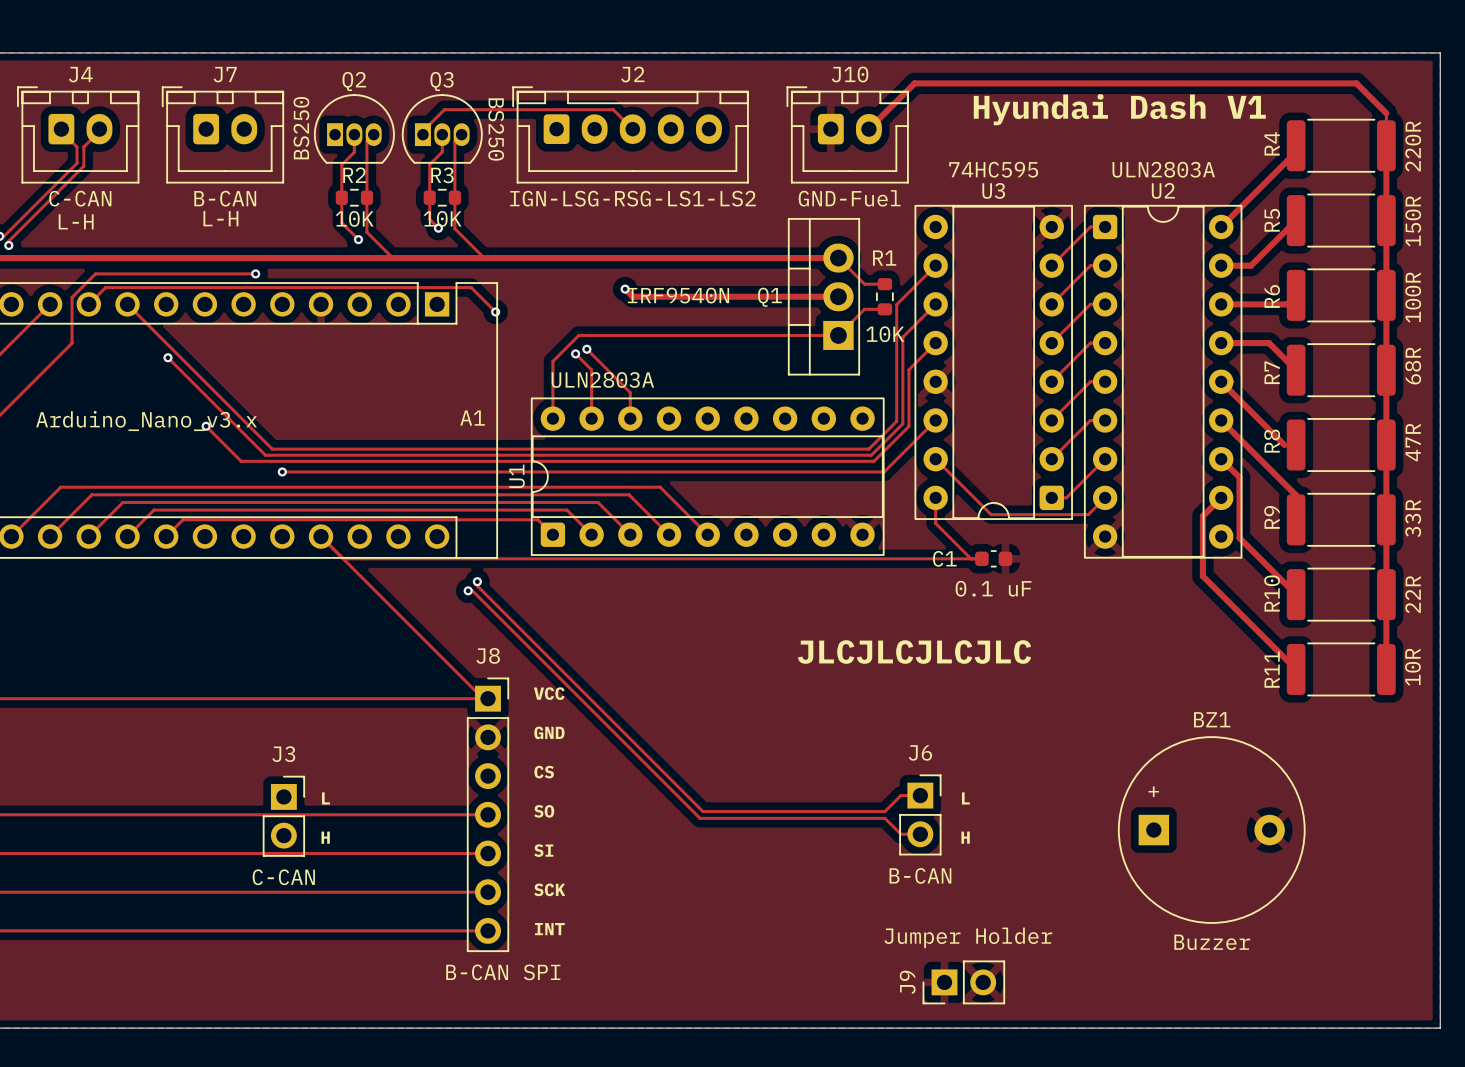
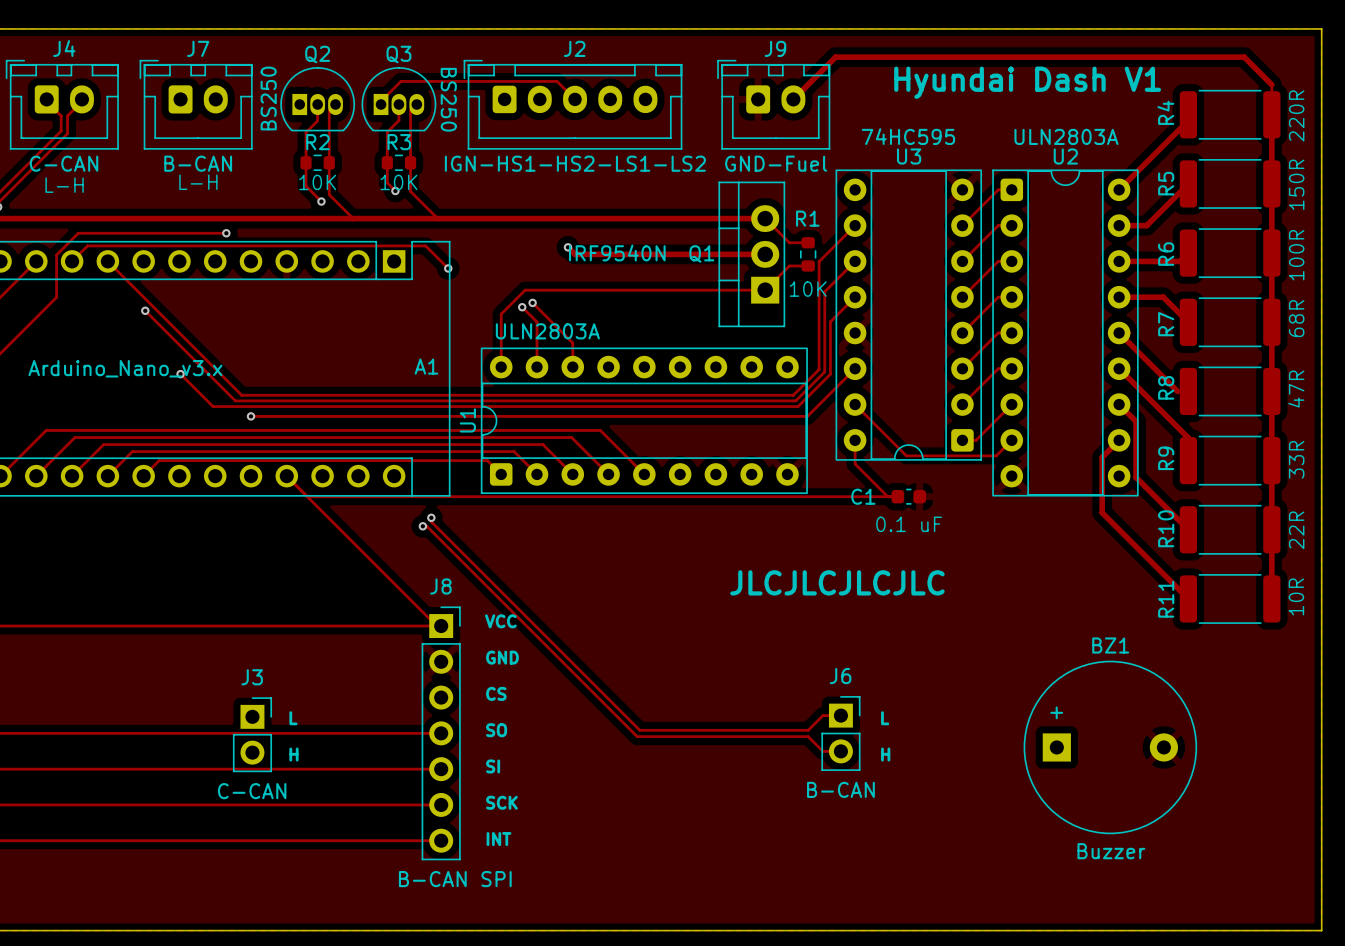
J10 name: J10 (850, 74) -> J9 (775, 48)
J2 value: IGN-LSG-RSG-LS1-LS2 (632, 198) -> IGN-HS1-HS2-LS1-LS2 (575, 163)
J9: Jumper Holder (963, 982) -> none

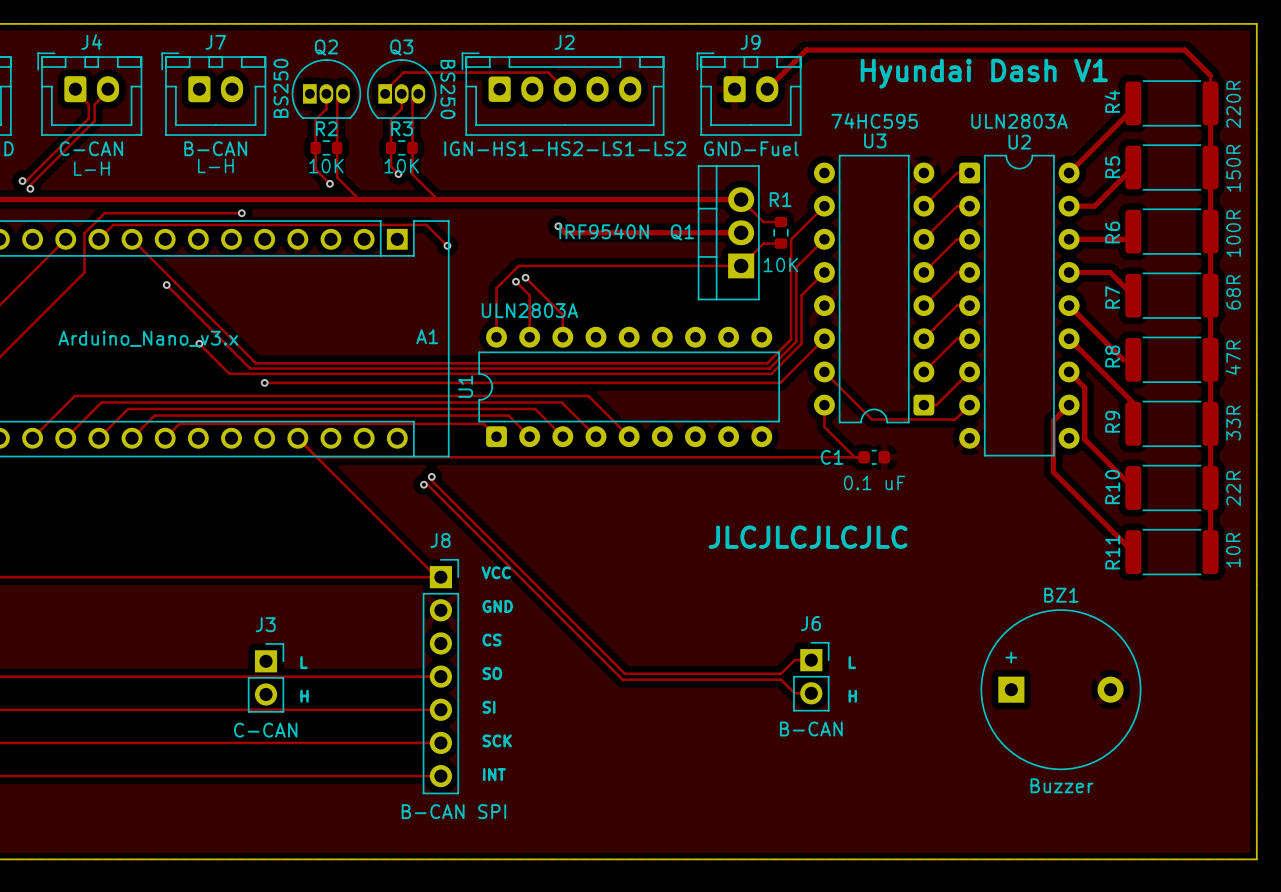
U3 footprint: [835, 169, 983, 461] -> [813, 154, 935, 424]
U2 footprint: [992, 169, 1139, 497] -> [959, 154, 1080, 457]
U1 footprint: [480, 347, 808, 495] -> [478, 326, 780, 448]

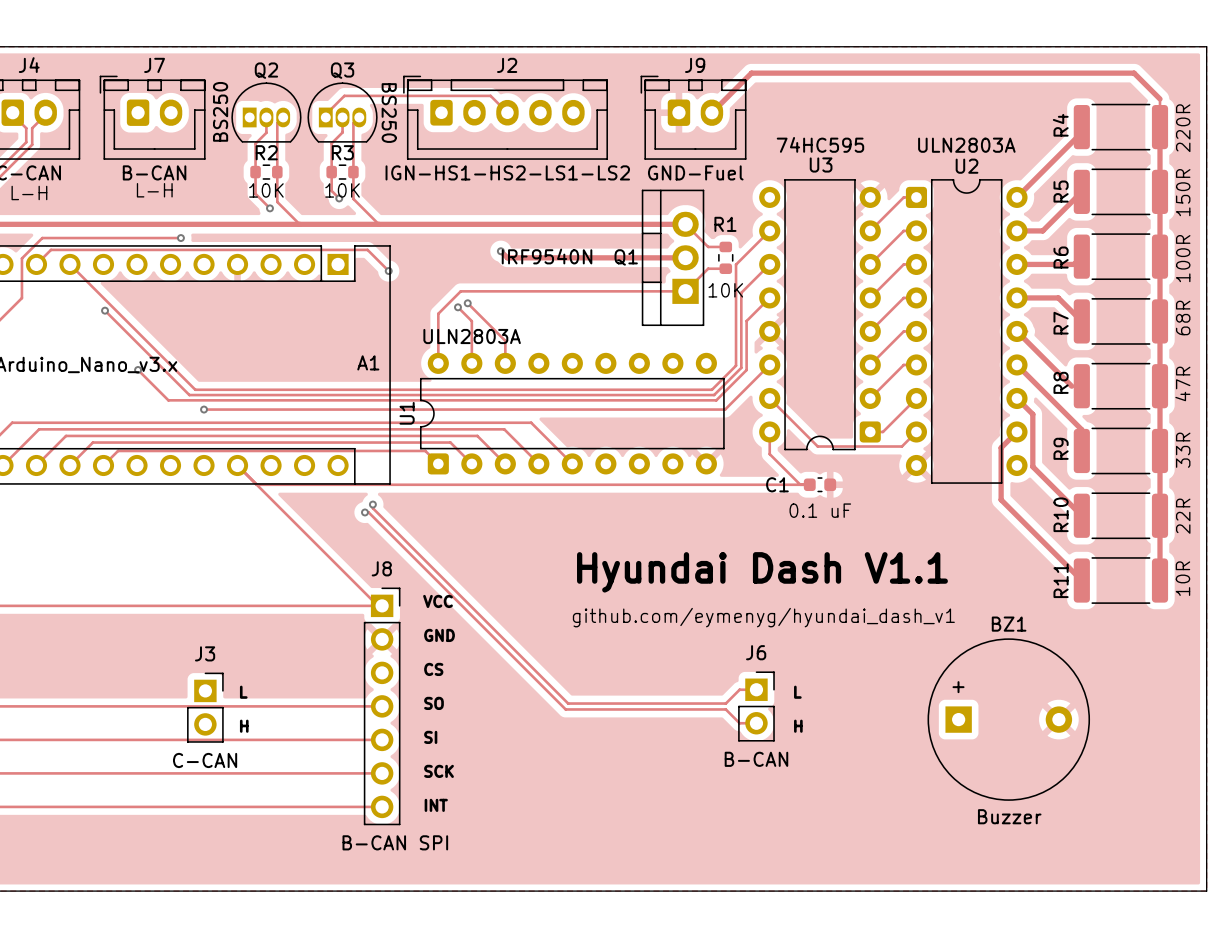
text: Hyundai Dash V1 (984, 73) -> none
text: JLCJLCJLCJLC (808, 537) -> none
text: none -> Hyundai Dash V1.1 (762, 572)
text: none -> github.com/eymenyg/hyundai_dash_v1 (763, 617)

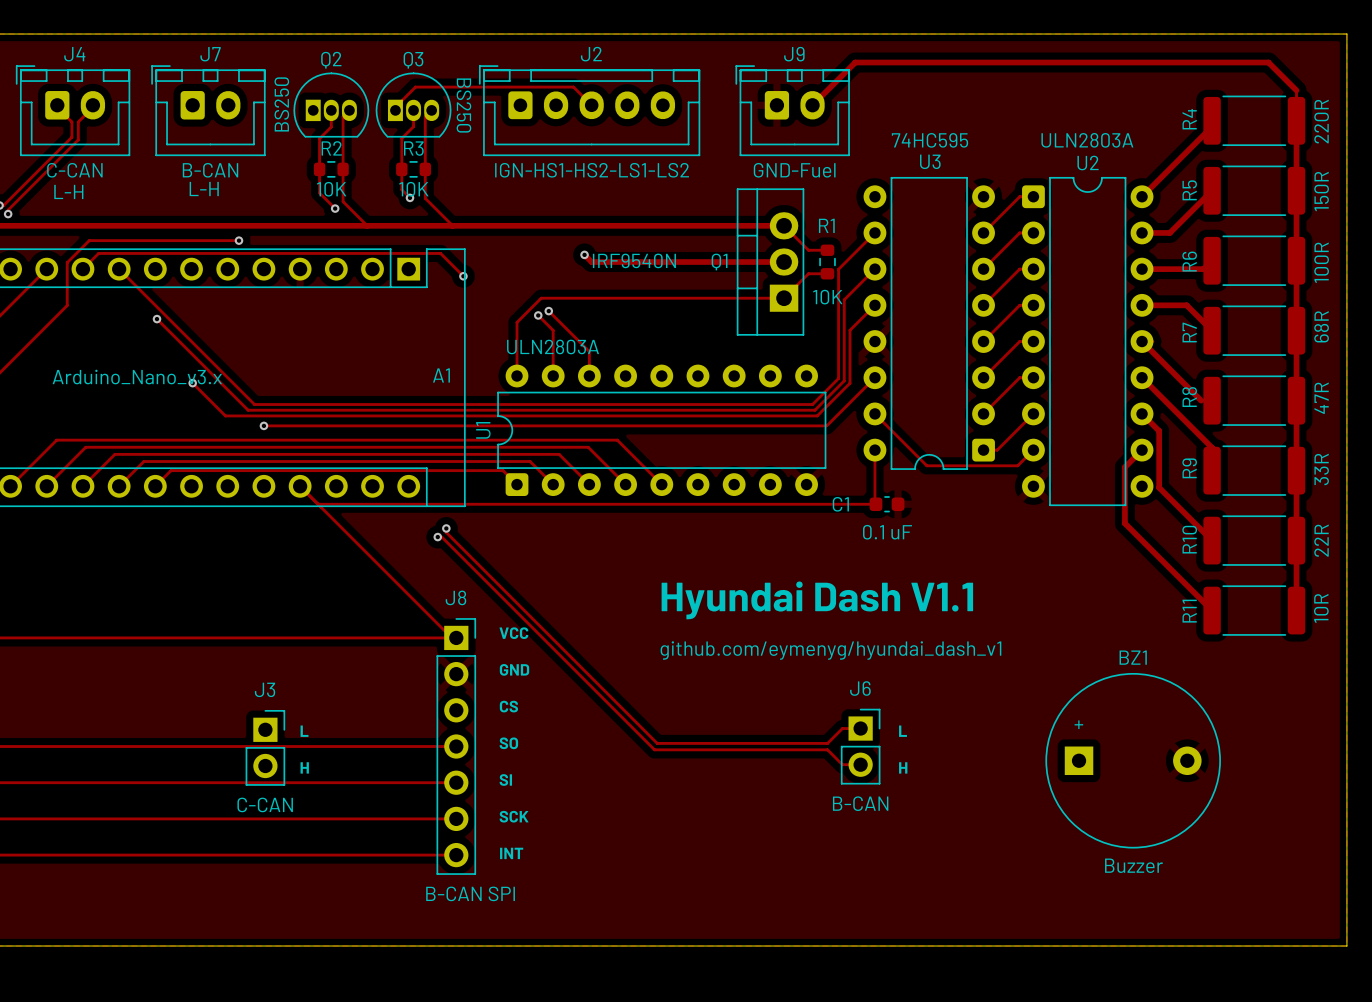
track: (769, 454) (800, 484) -> (874, 474) (875, 504) (318, 504)
track: (256, 484) (809, 484) -> none
C1 position: (819, 484) -> (887, 504)

